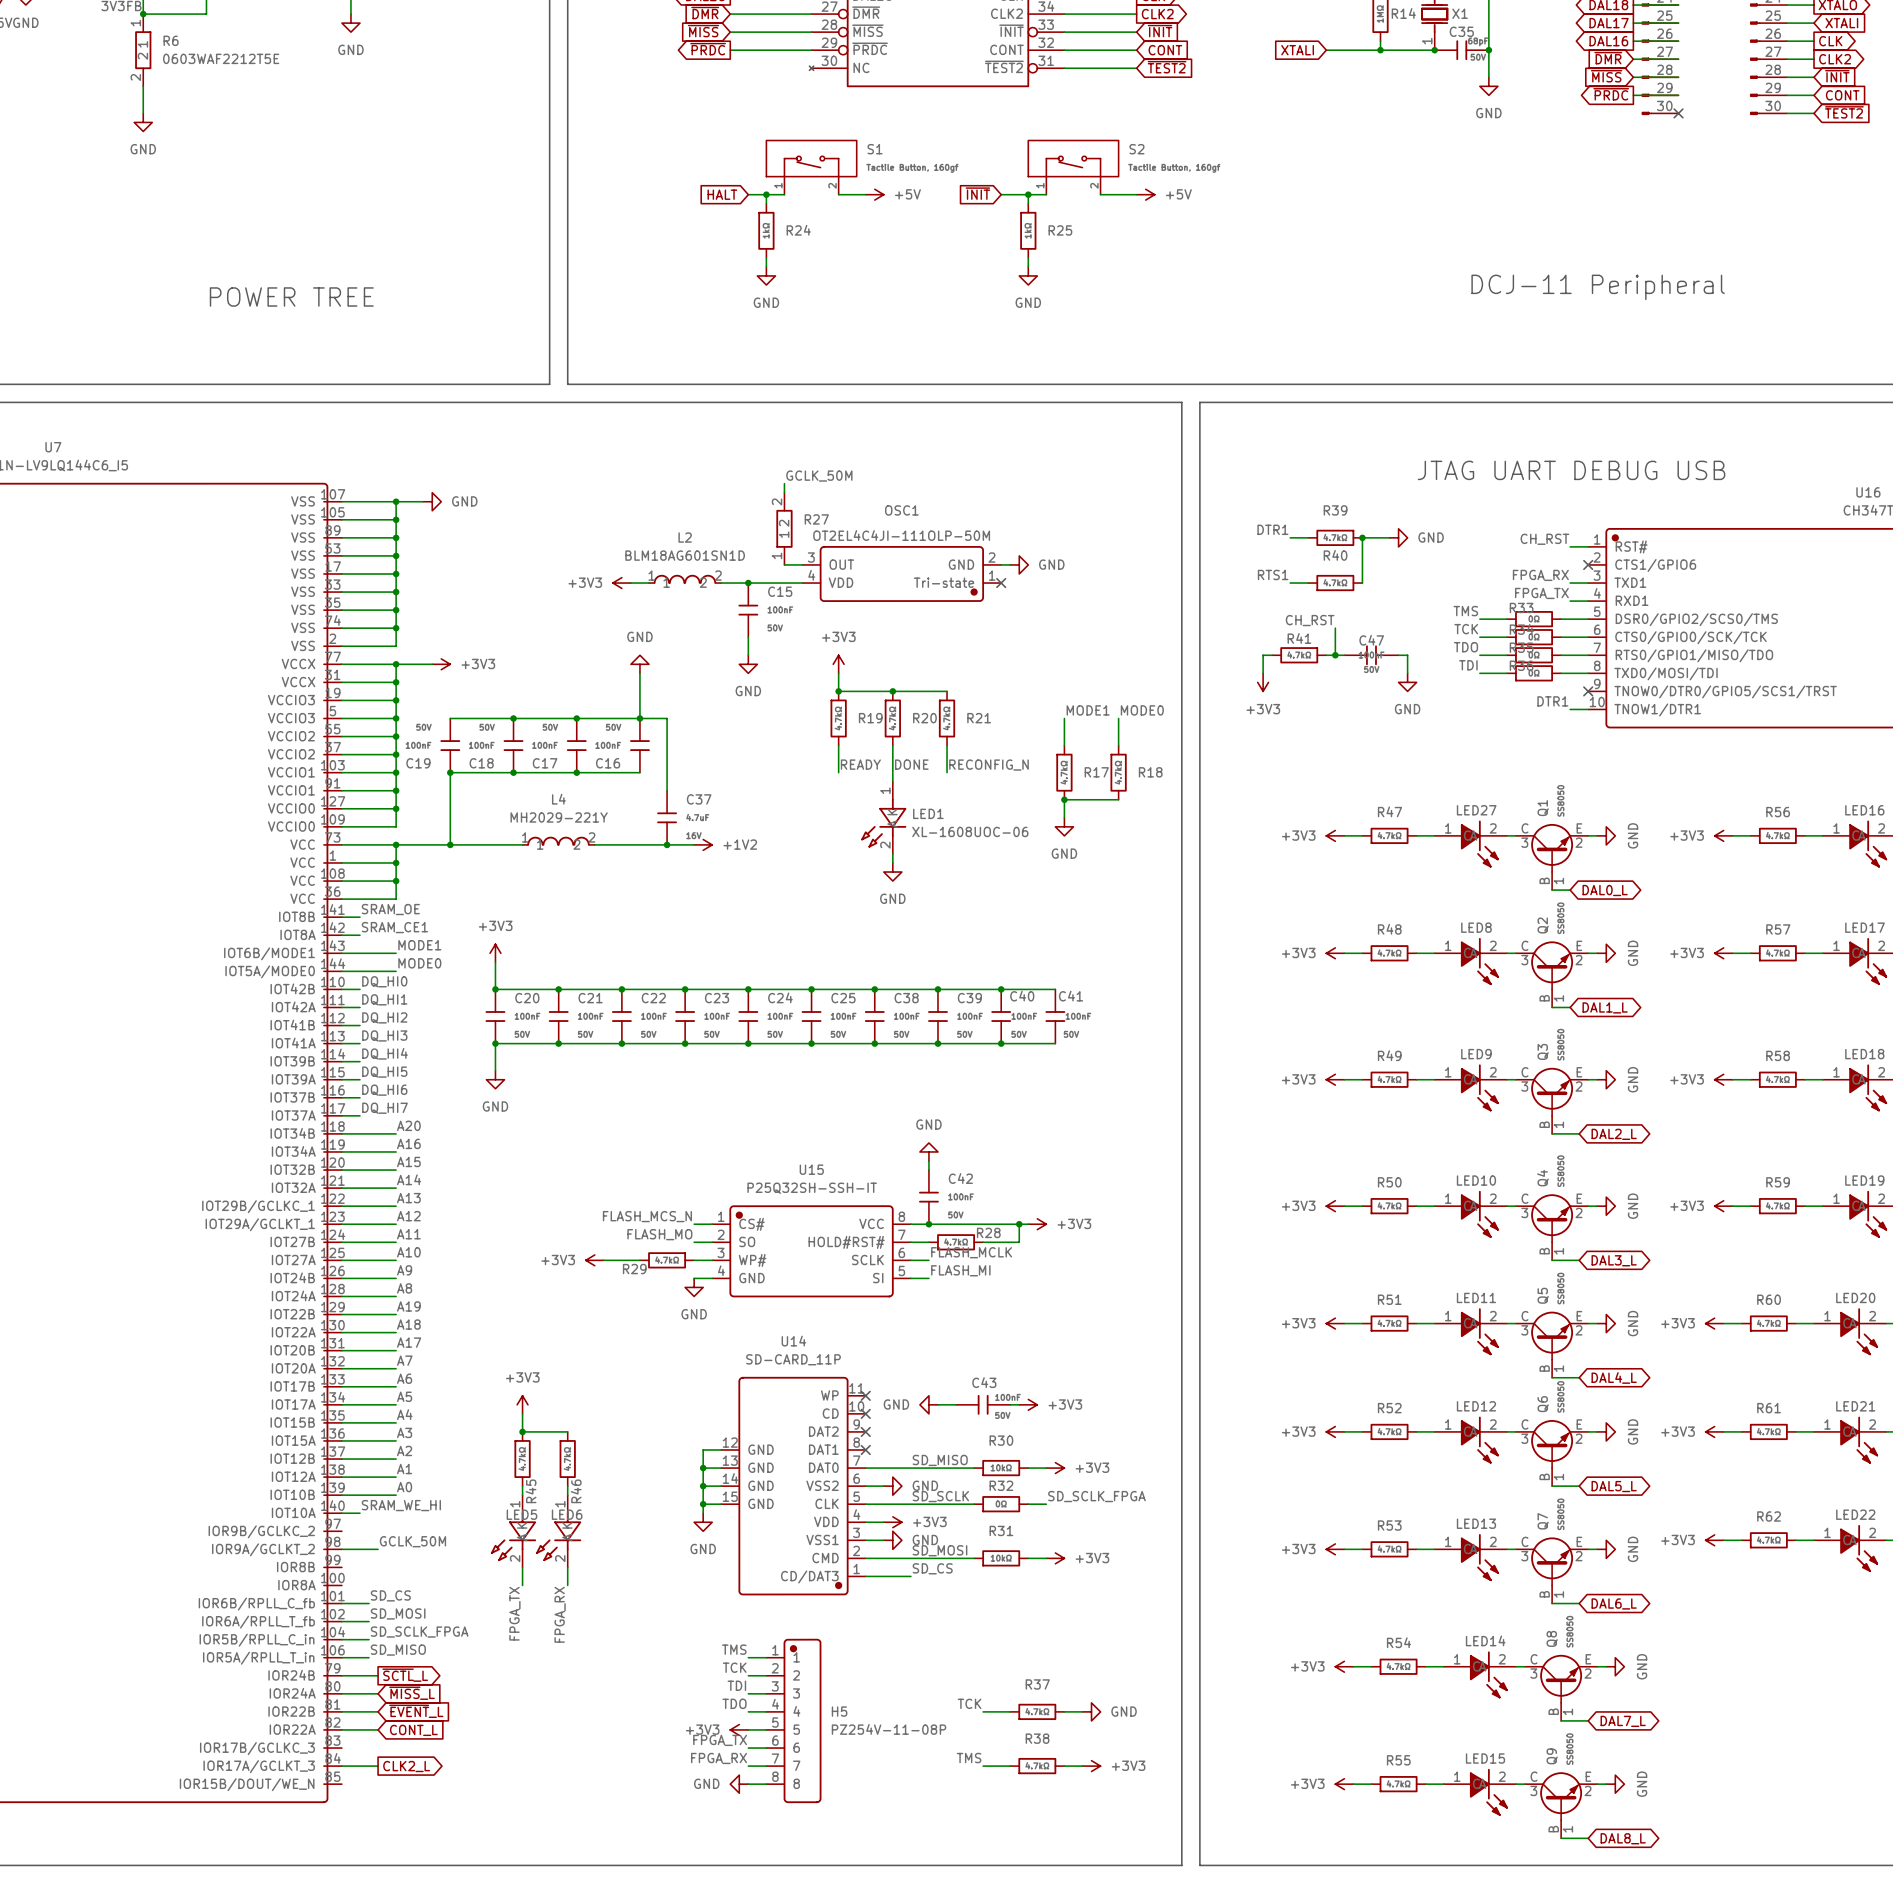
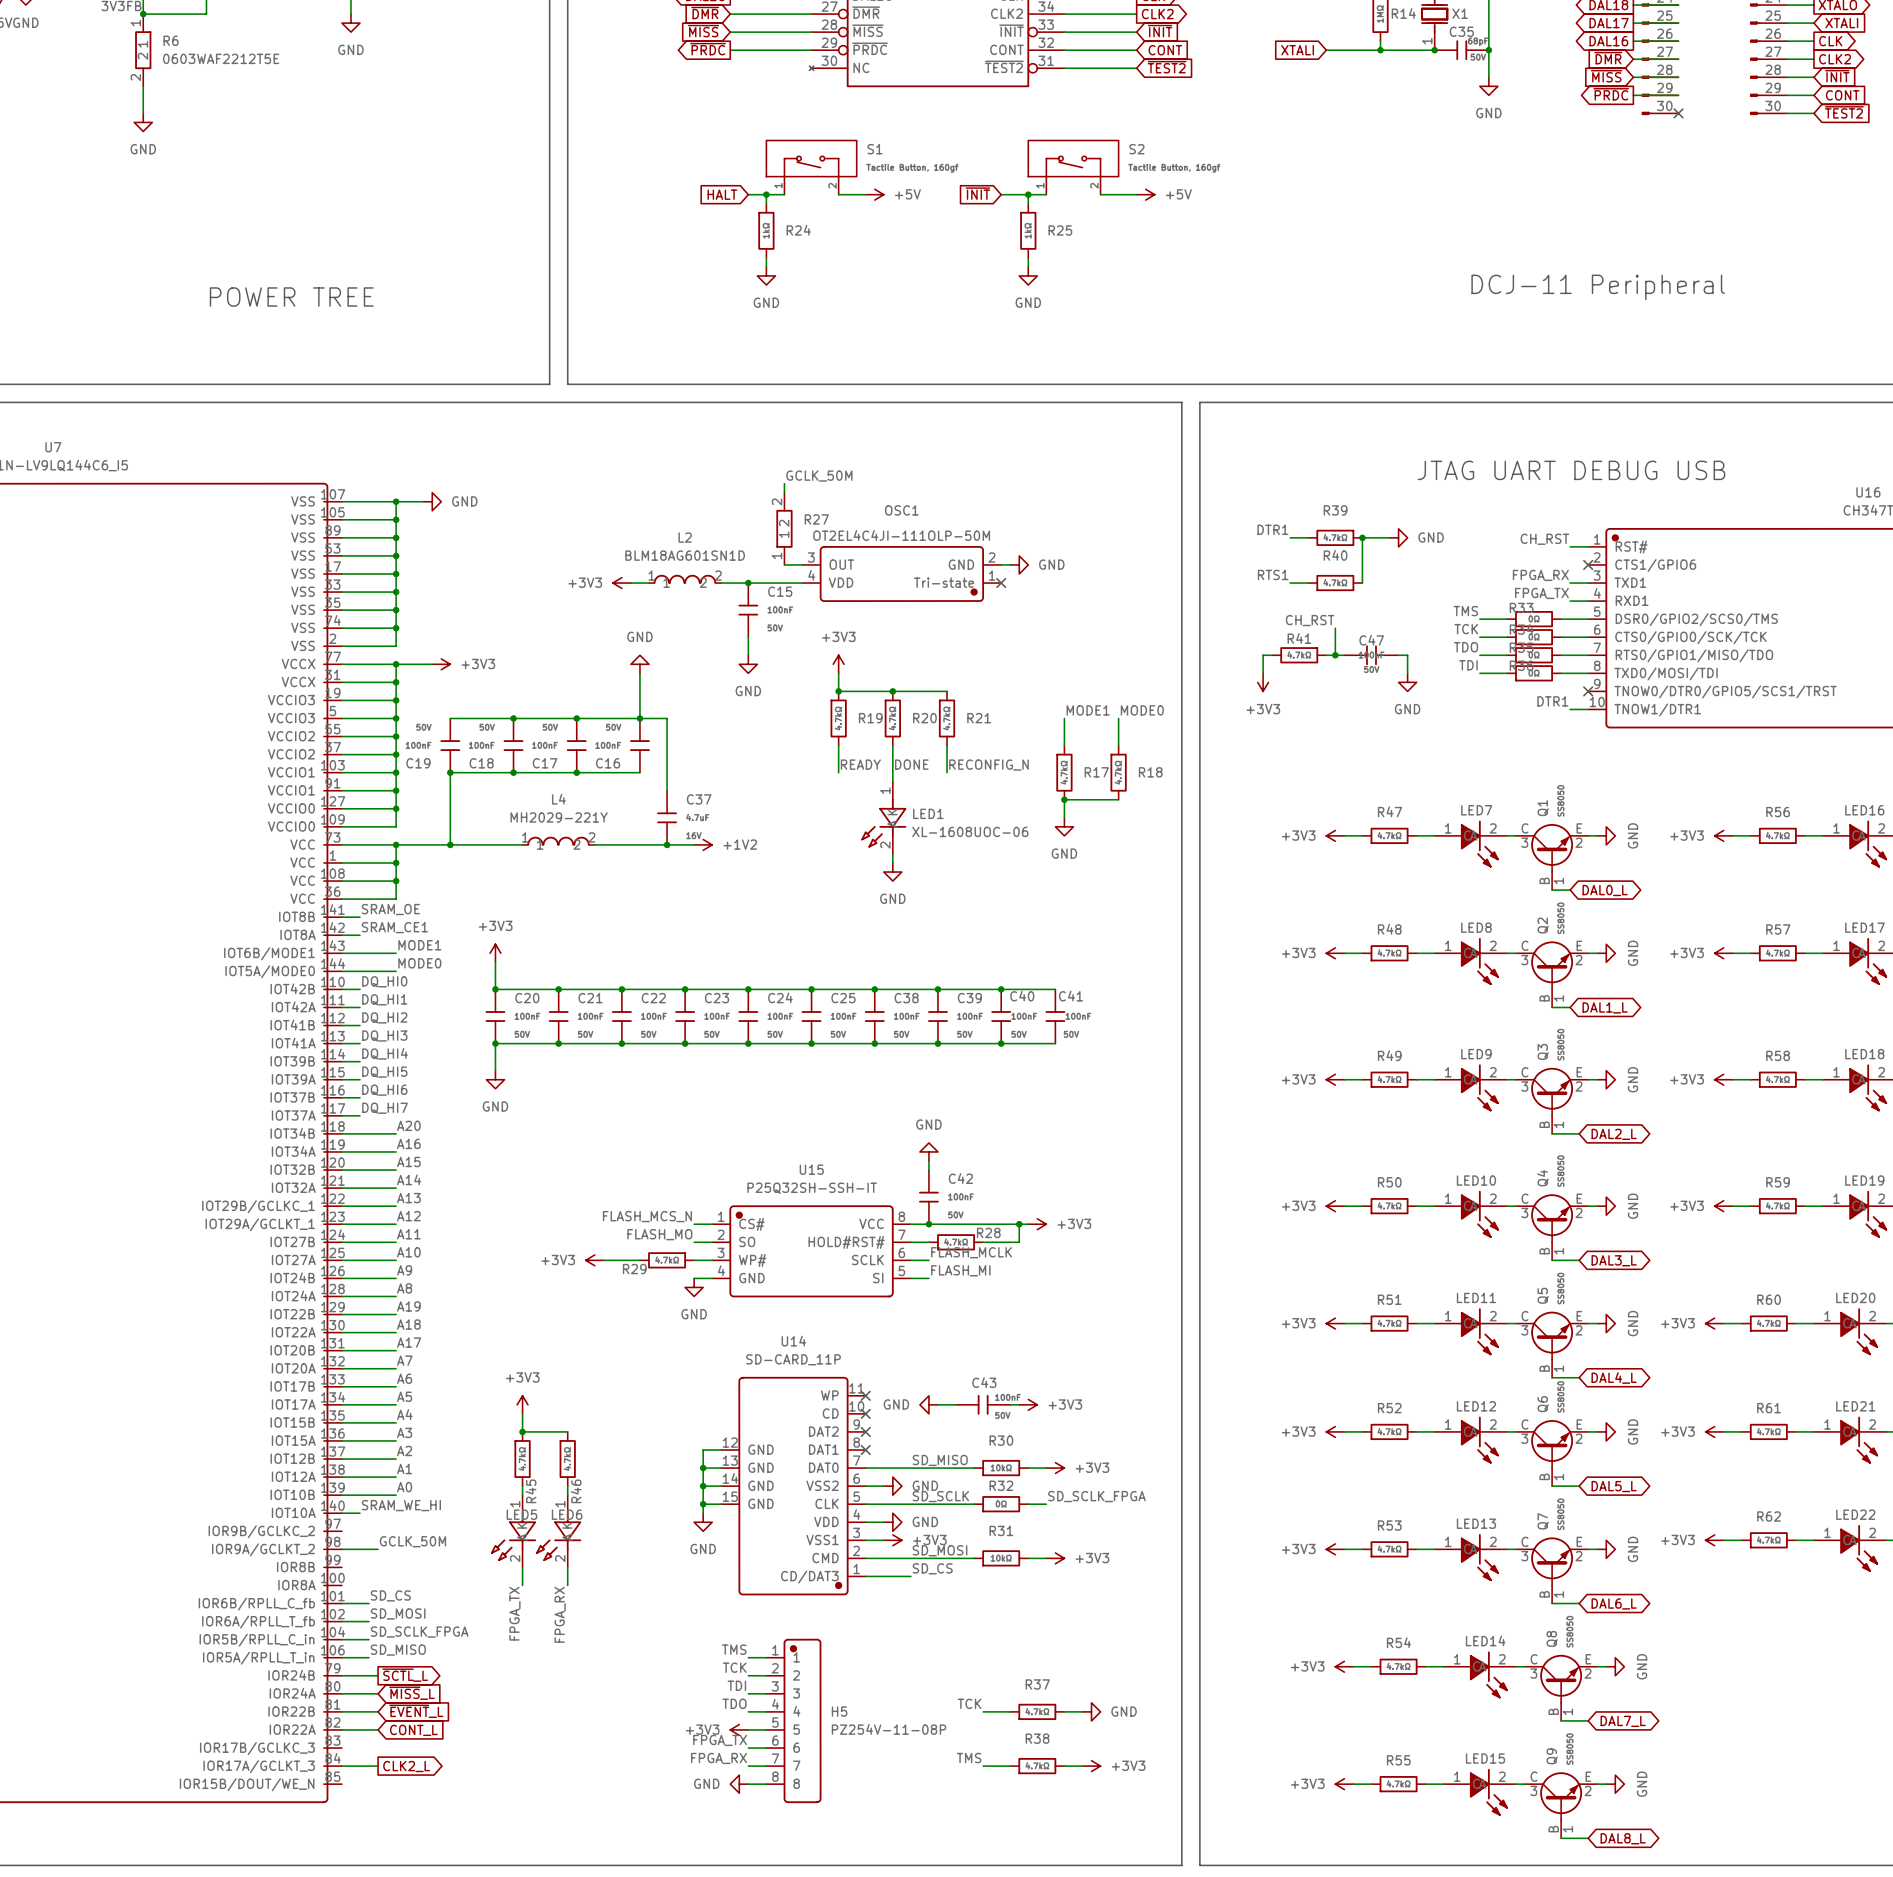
LED27 name: LED27 (1476, 810) -> LED7 (1476, 810)
power symbol: +3V3 (892, 1522) -> GND (892, 1522)
power symbol: GND (892, 1540) -> +3V3 (892, 1540)

